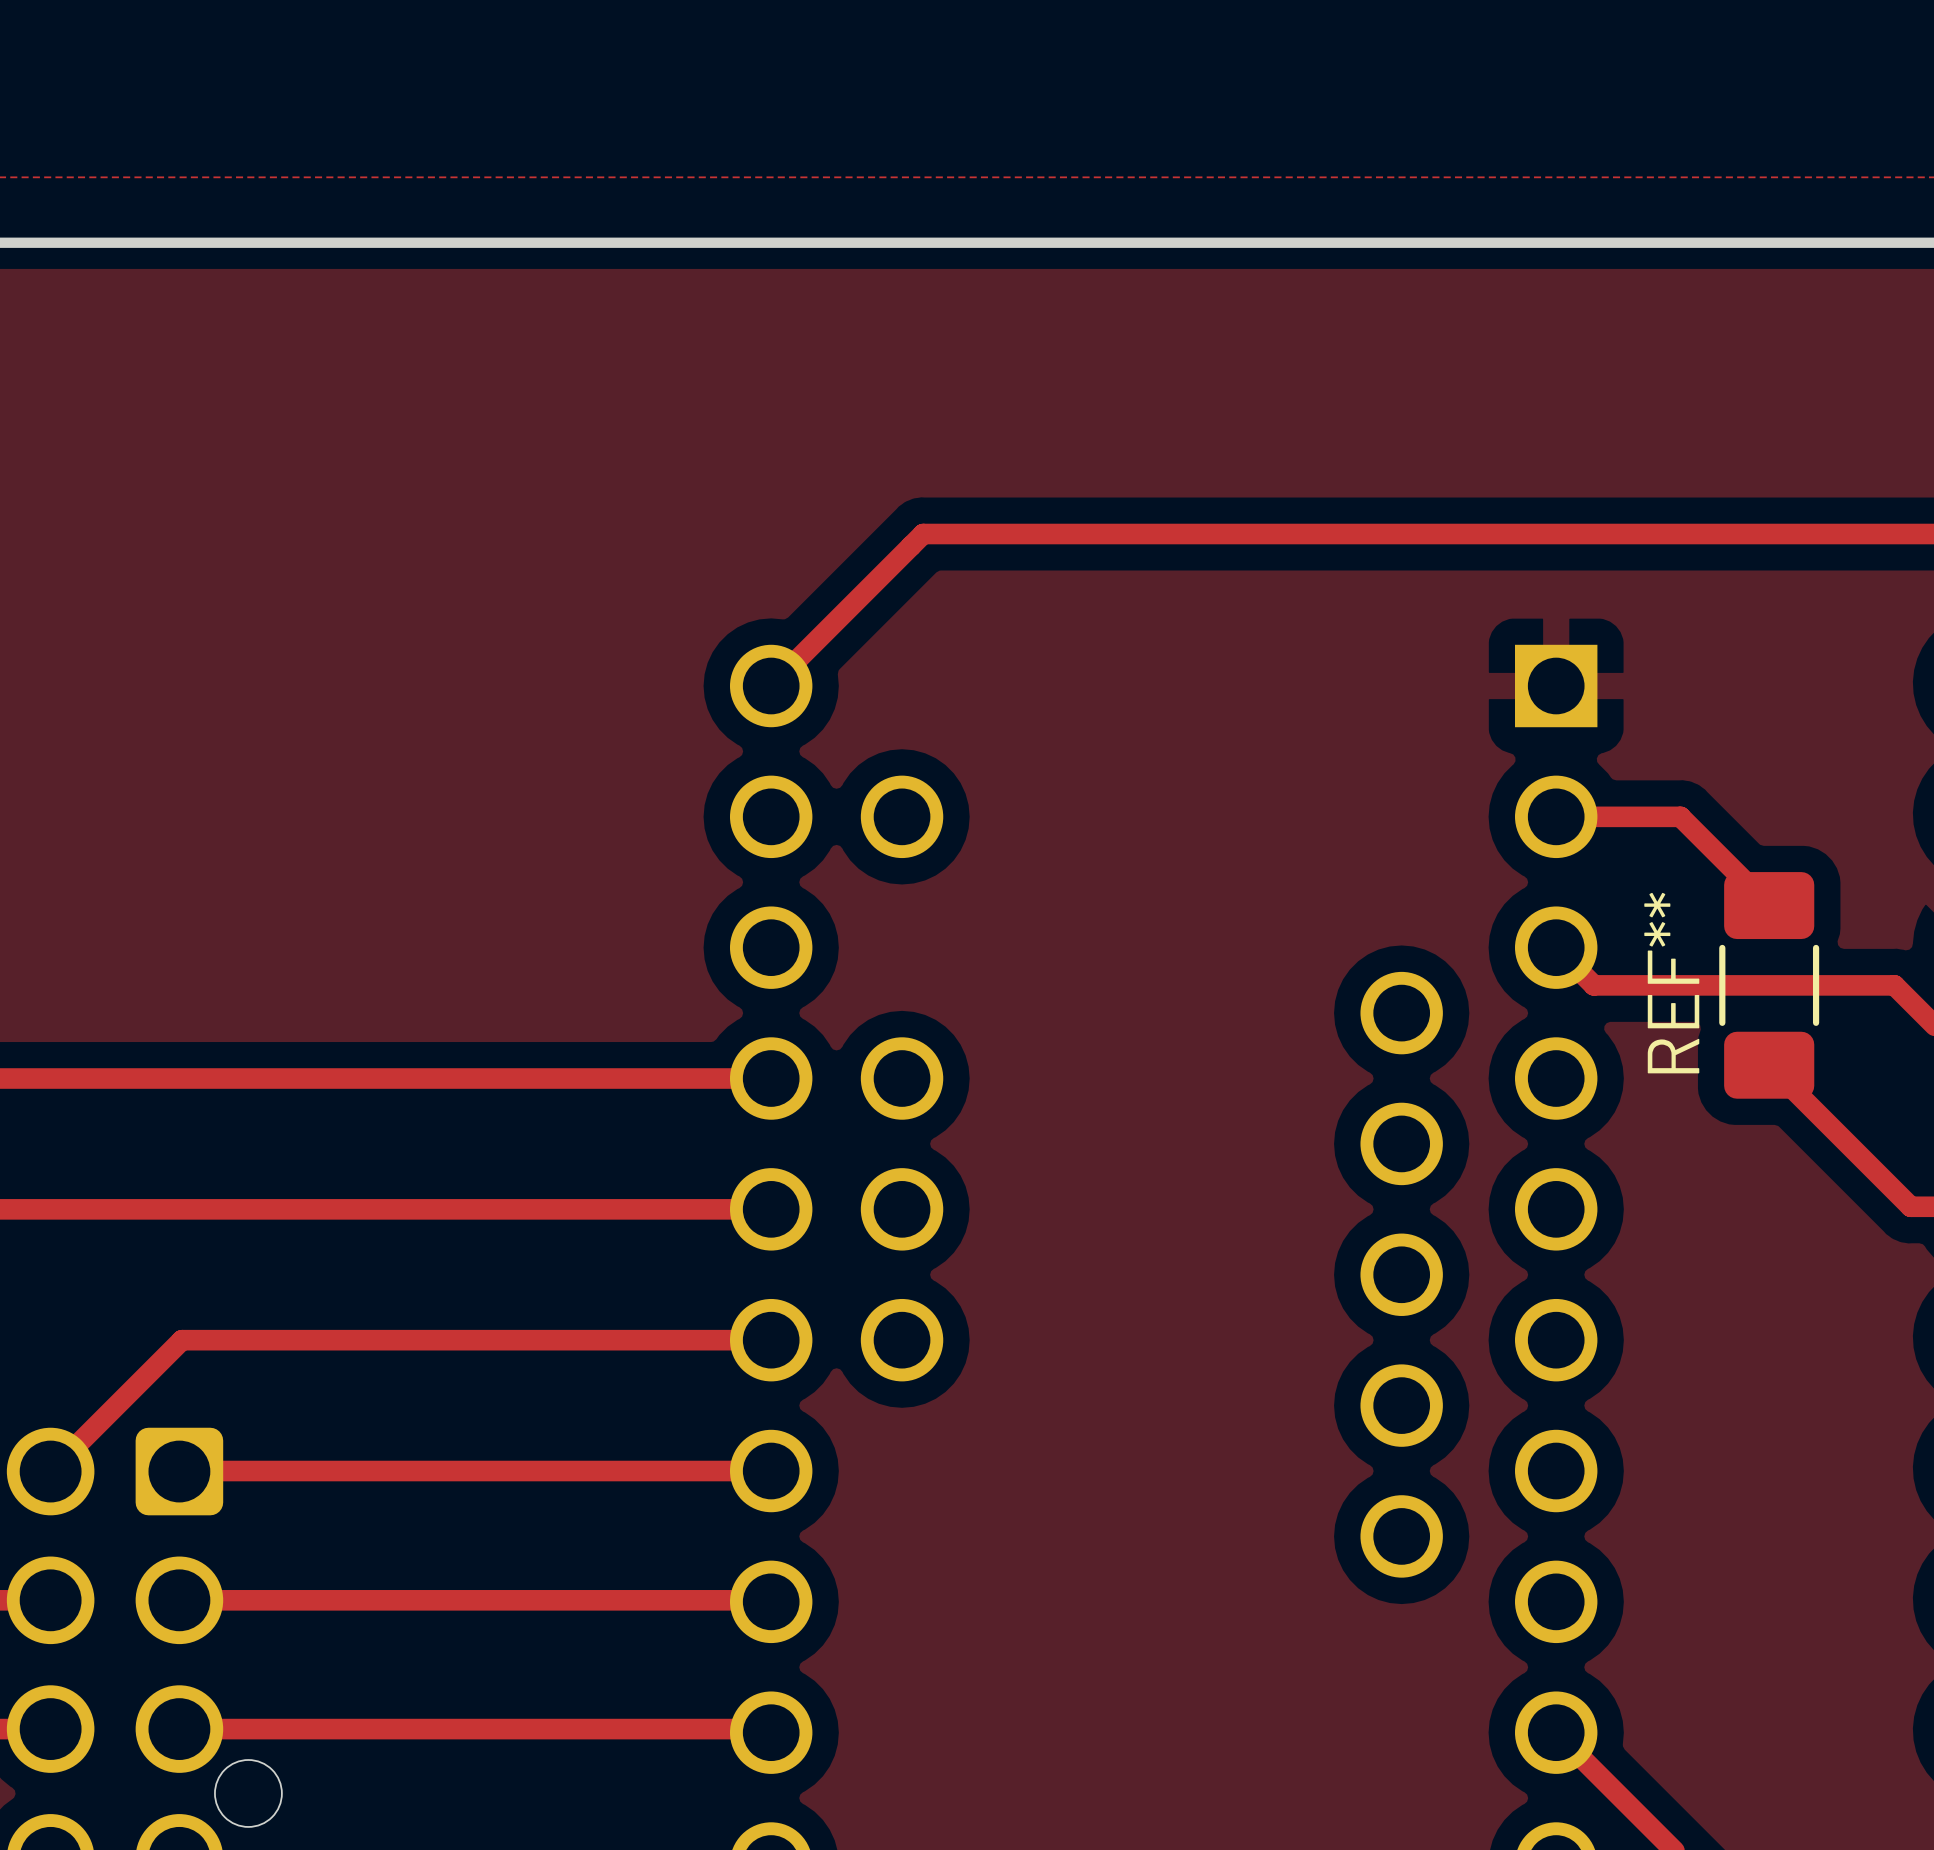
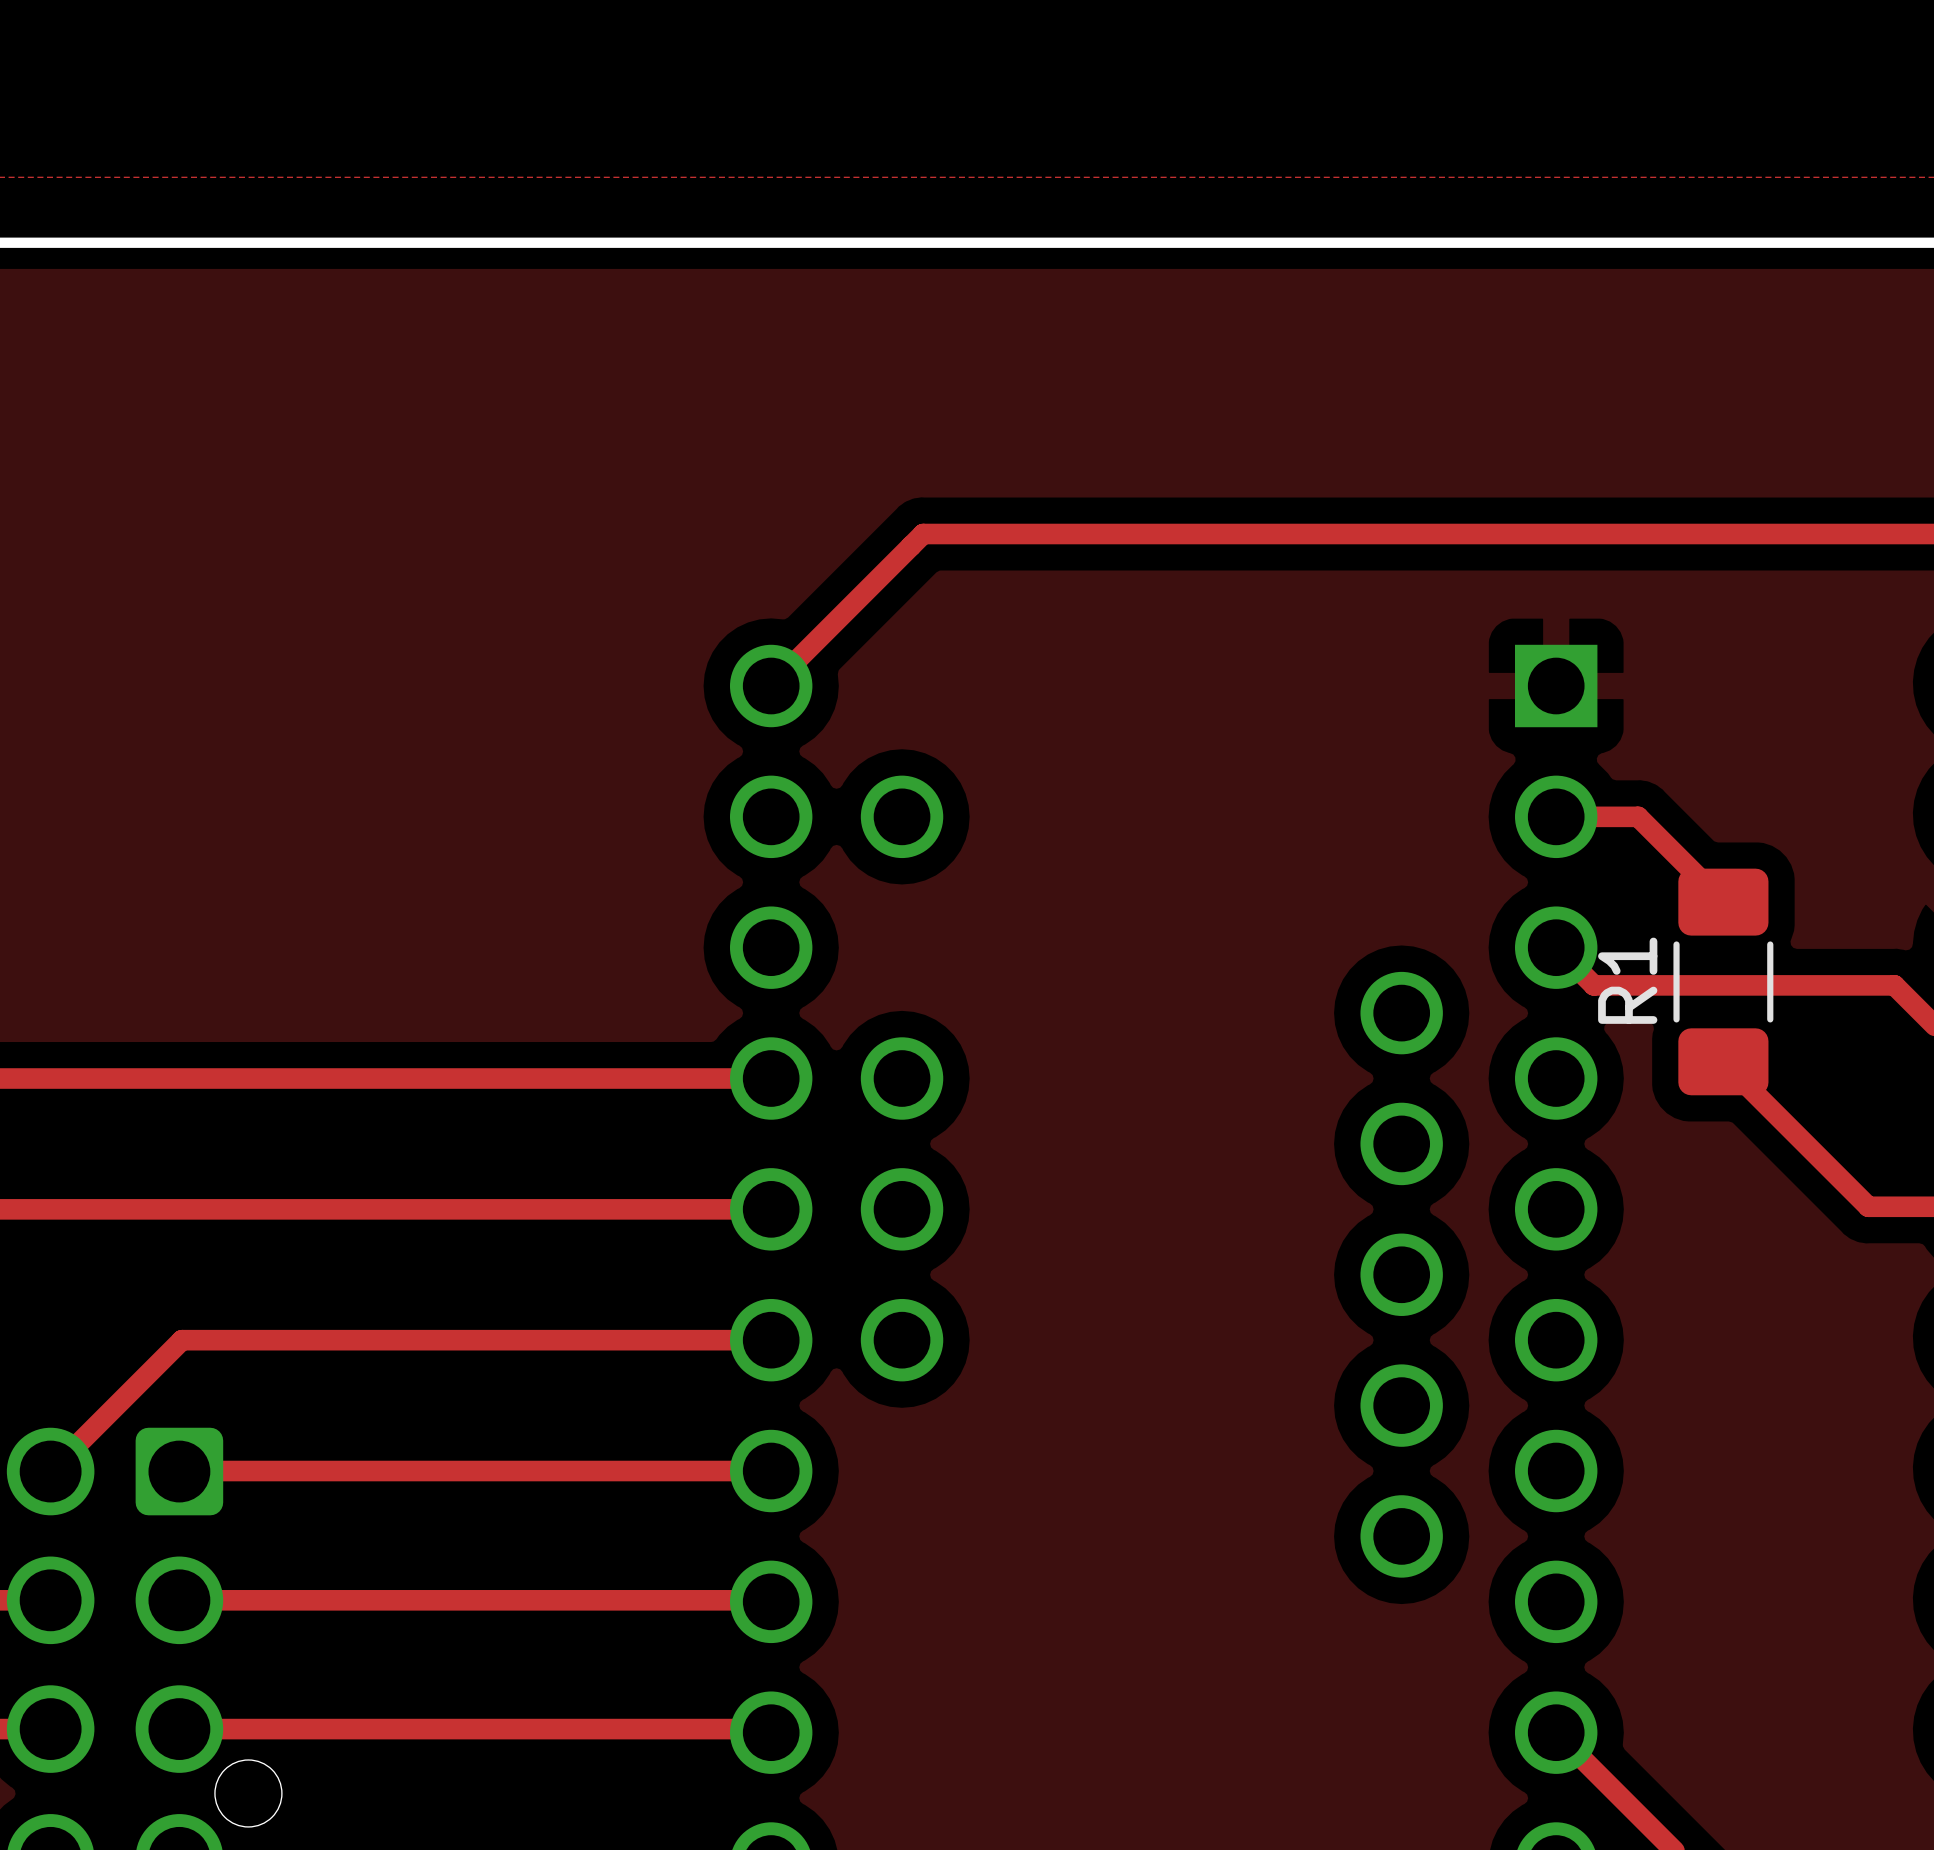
track: (1638, 816) (1680, 816) (1769, 905) -> (1638, 816) (1723, 902)
REF** name: REF** (1671, 983) -> R1 (1627, 980)
REF** position: (1769, 985) -> (1723, 981)
track: (1769, 1065) (1910, 1206) -> (1723, 1061) (1868, 1206) (1910, 1206)

